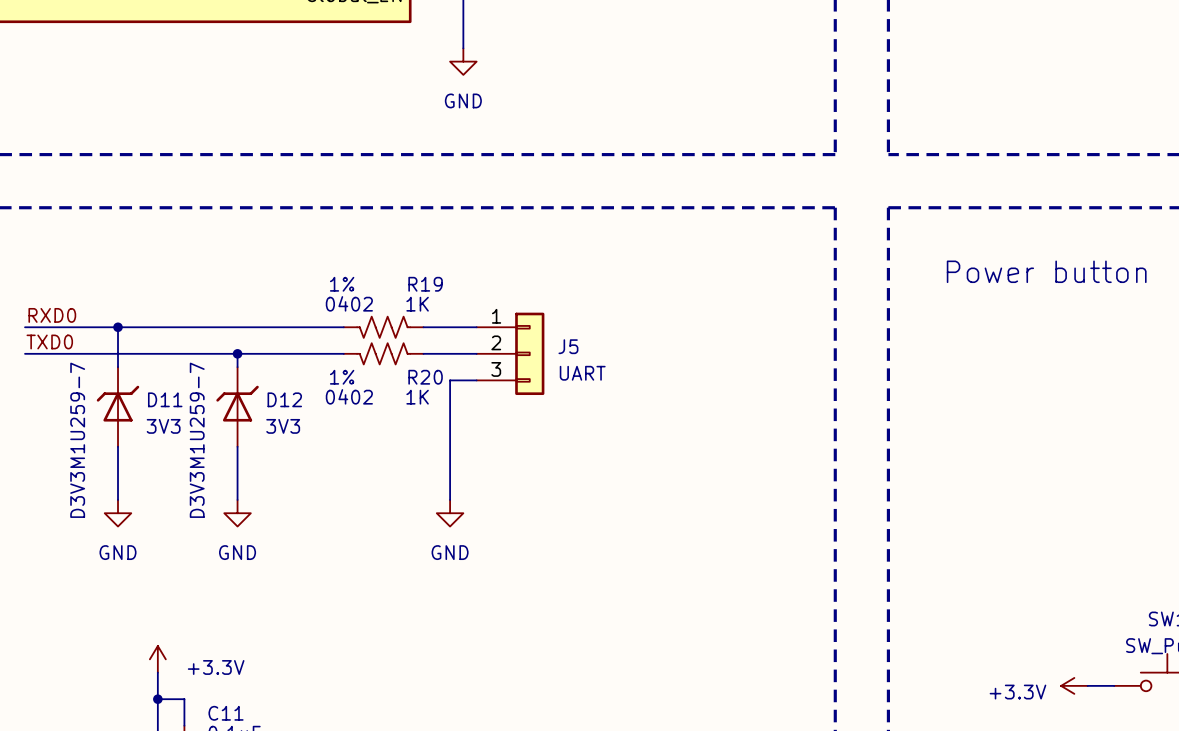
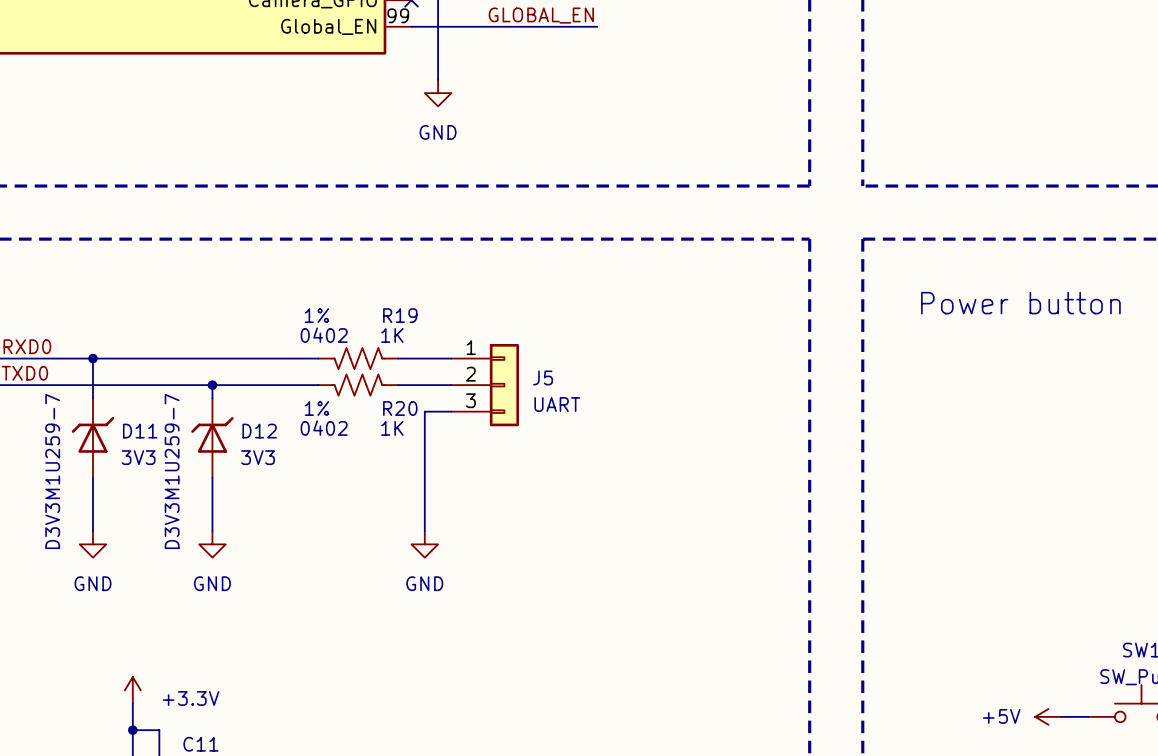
power symbol: +3.3V (1074, 685) -> +5V (1048, 716)

